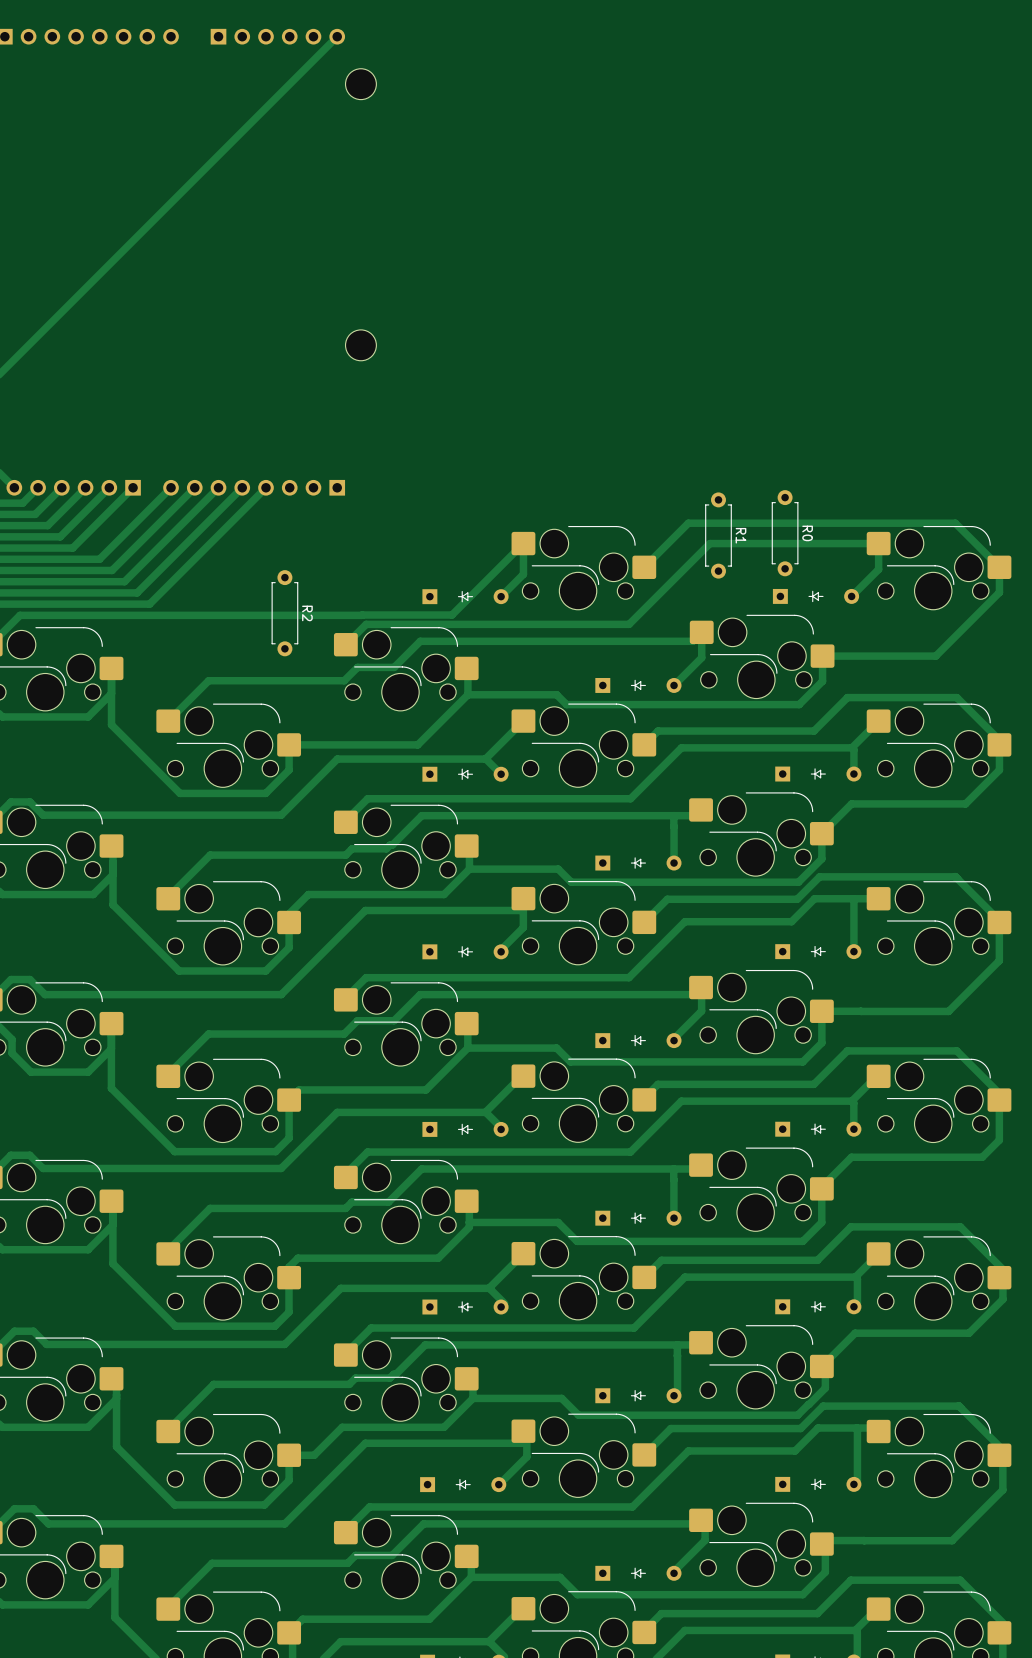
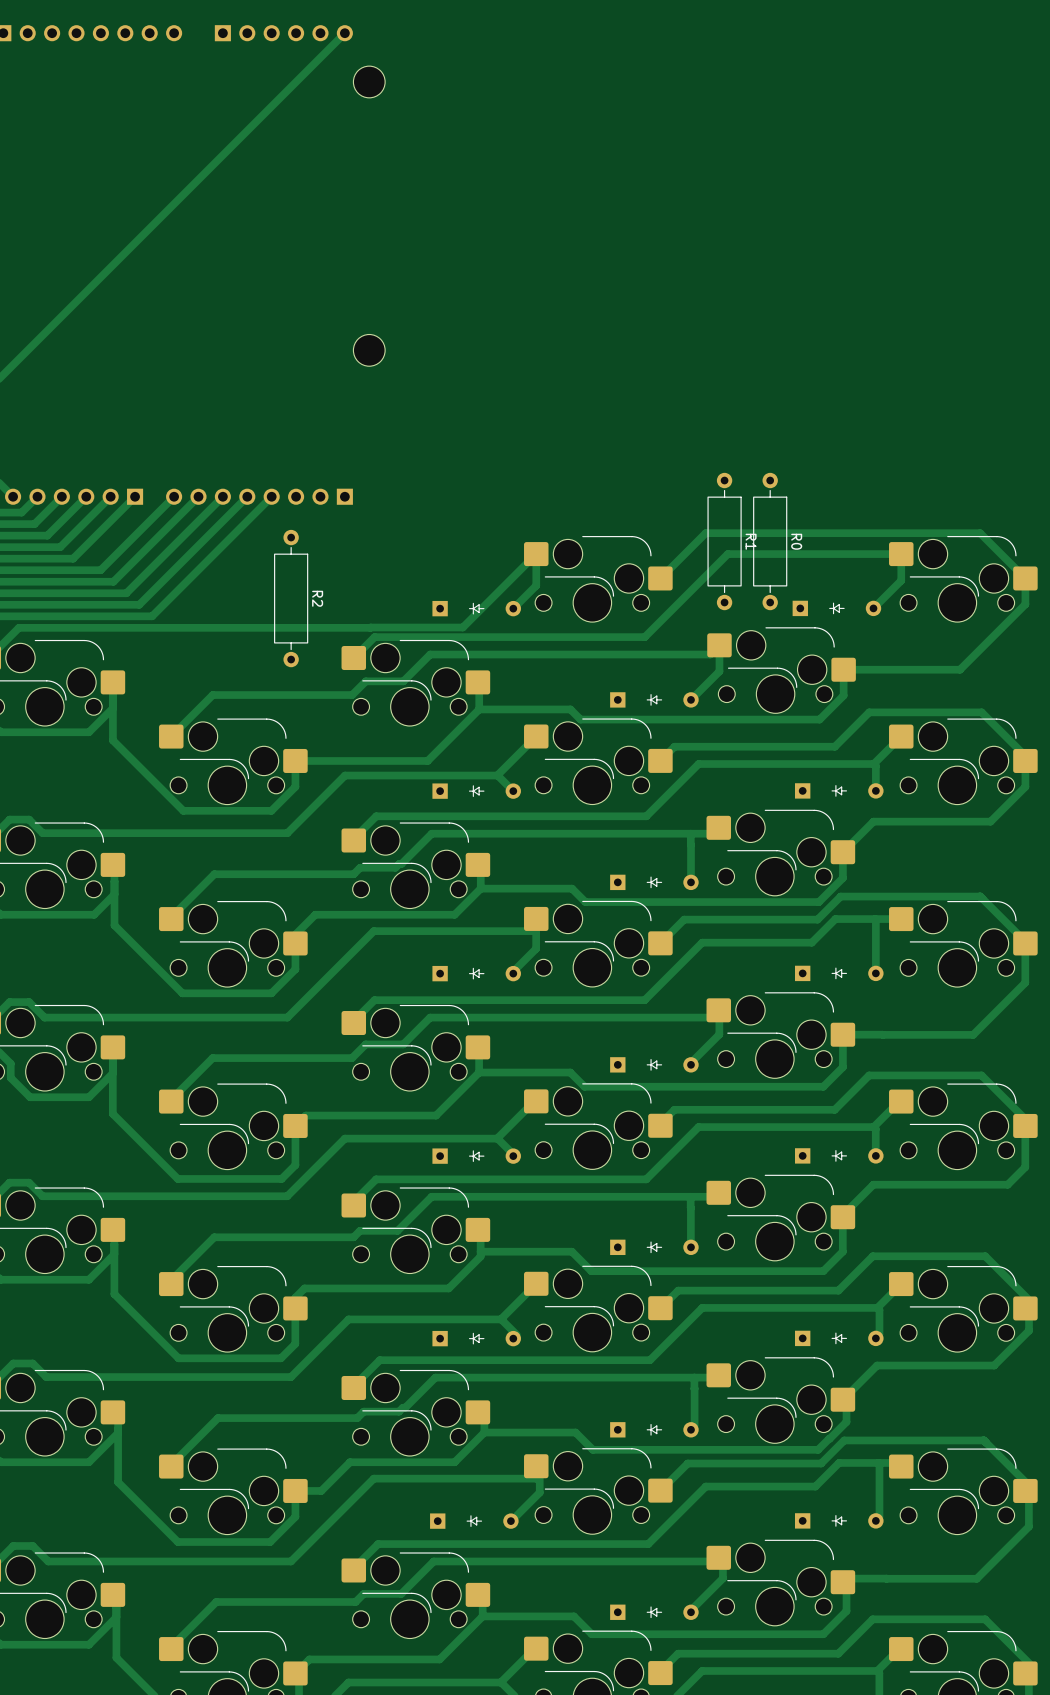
R0 footprint: [771, 490, 799, 577] -> [753, 472, 788, 611]
R1 footprint: [705, 492, 732, 579] -> [707, 472, 742, 611]
R2 footprint: [271, 570, 299, 657] -> [274, 529, 309, 668]

